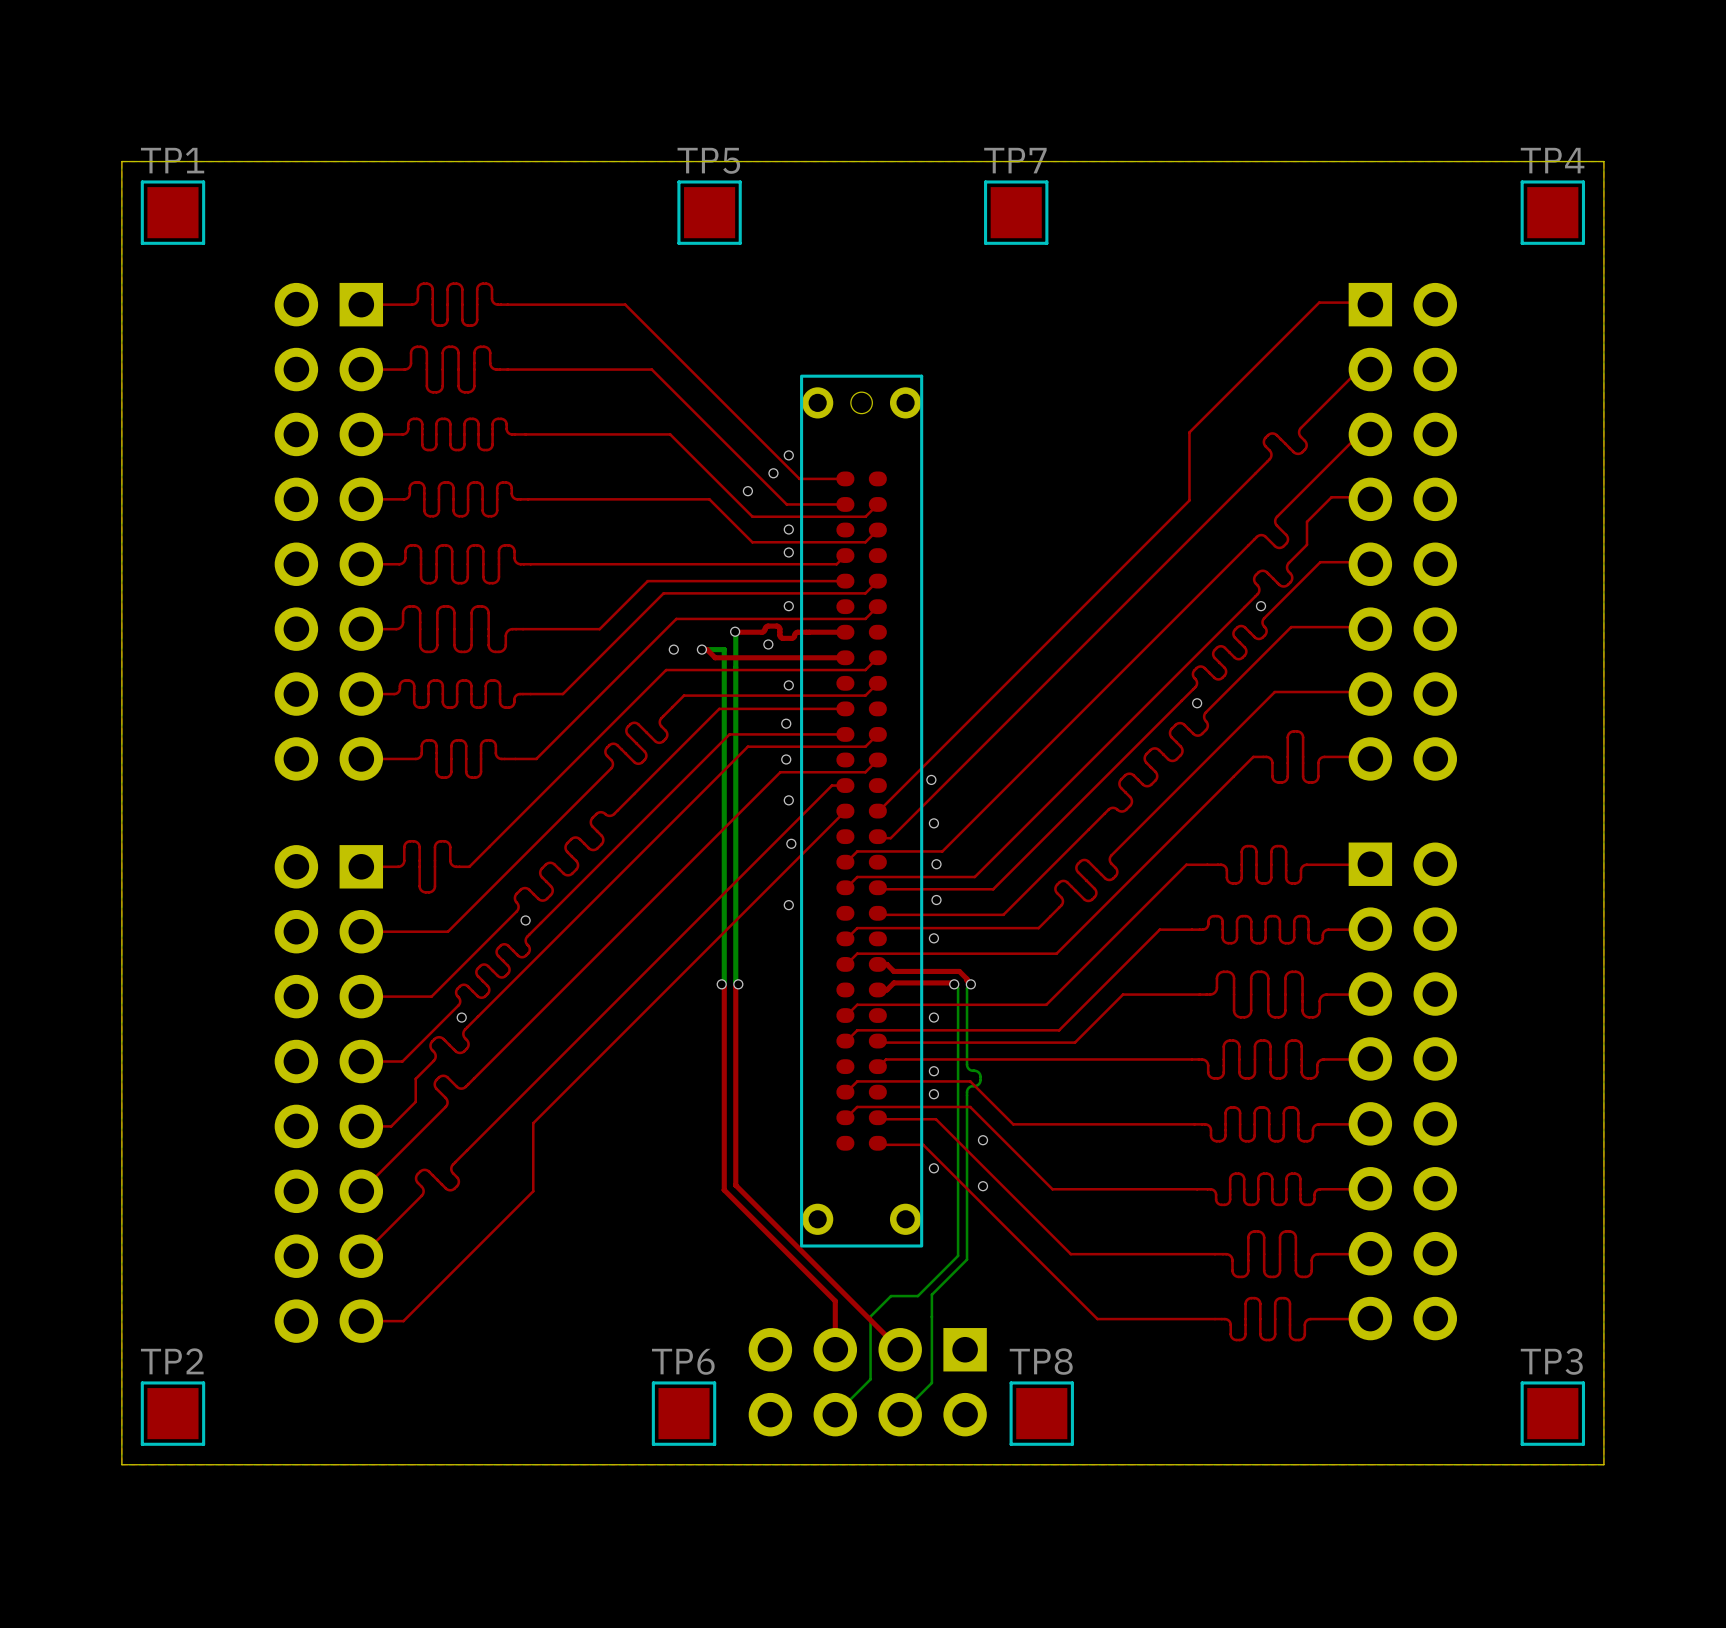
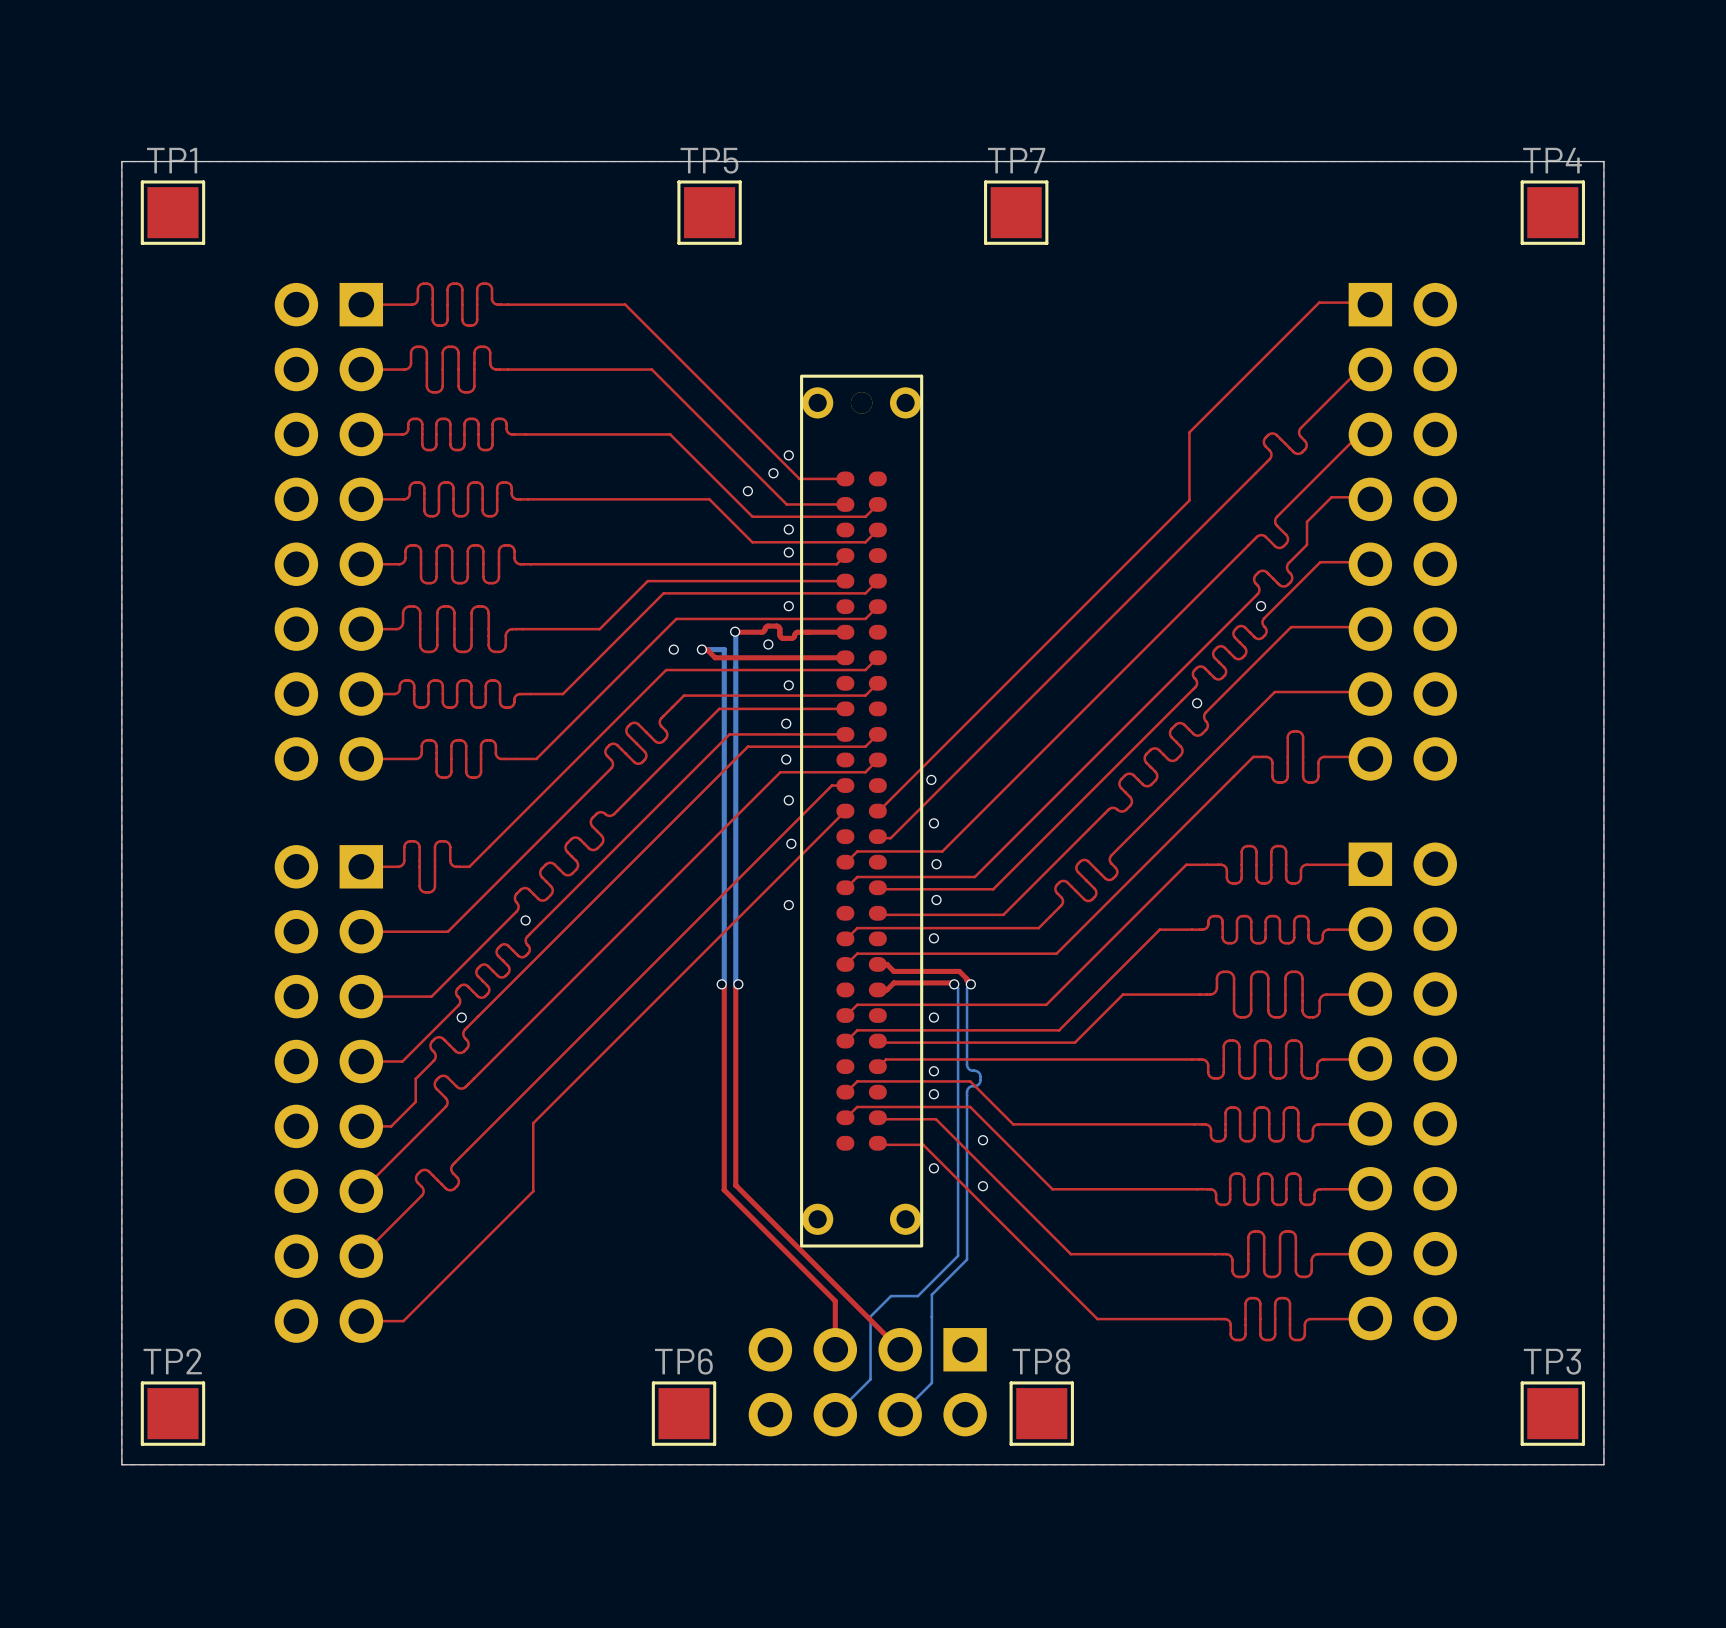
part footprint: [800, 374, 924, 1248] -> [800, 374, 924, 1248]

